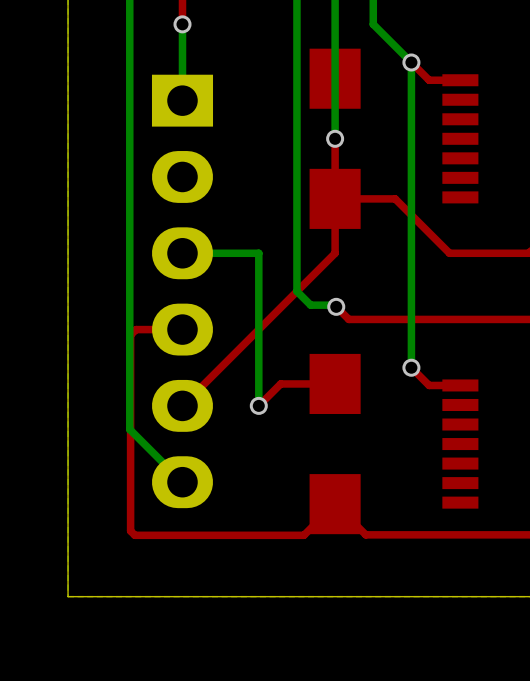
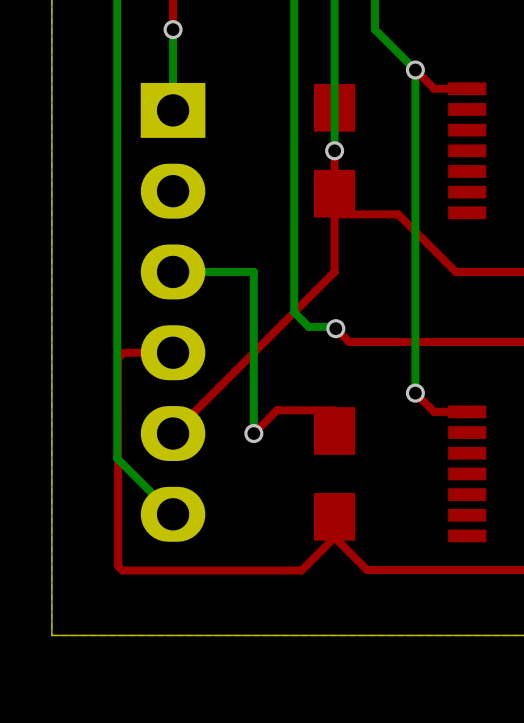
part footprint: [309, 48, 361, 229] -> [313, 84, 356, 218]
part footprint: [309, 353, 361, 535] -> [313, 407, 356, 541]

